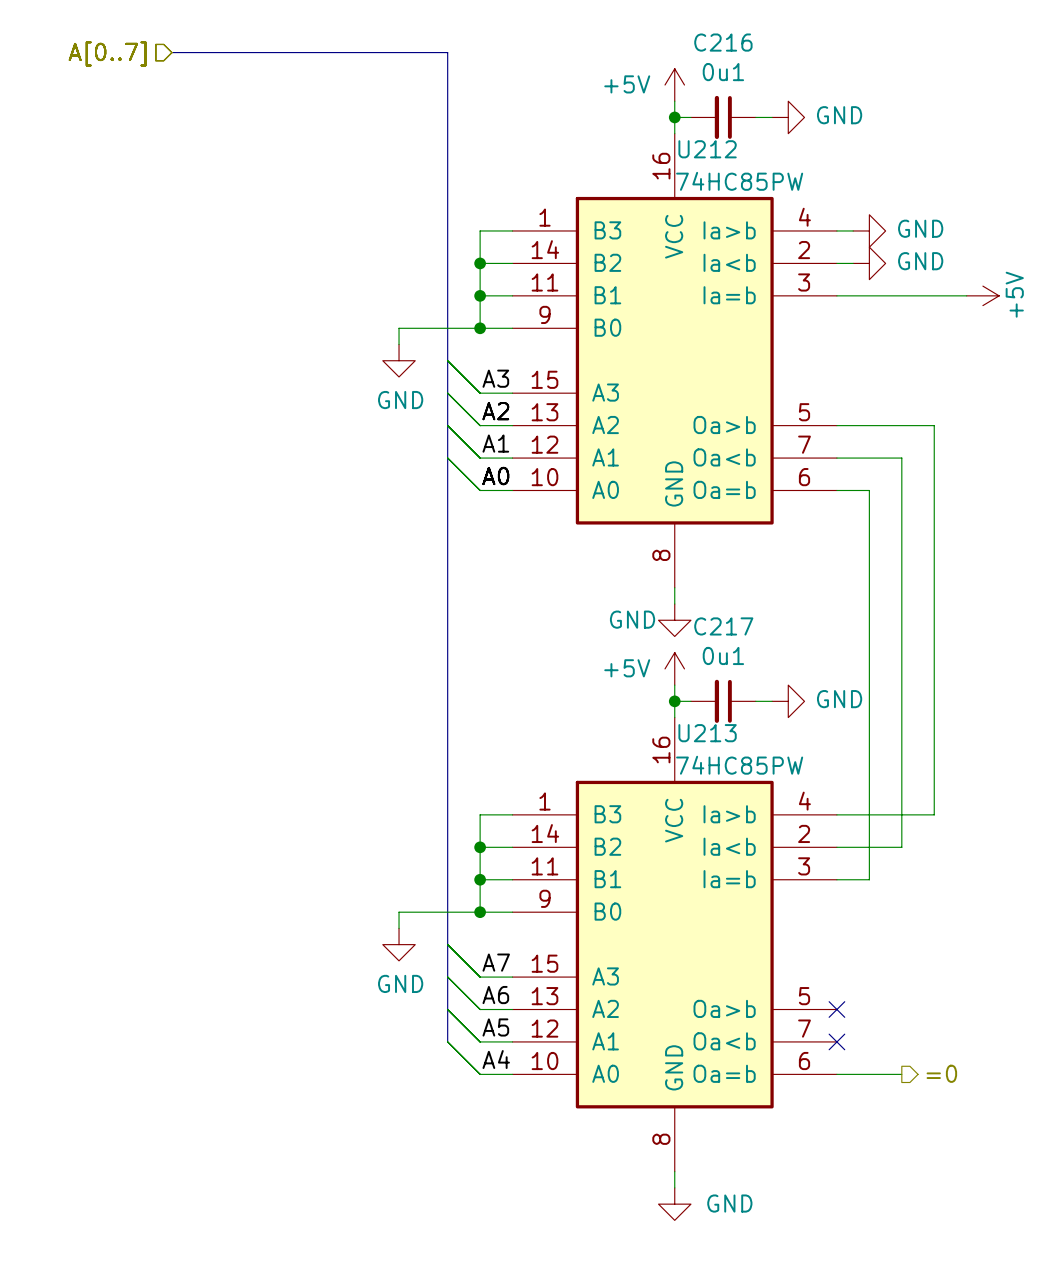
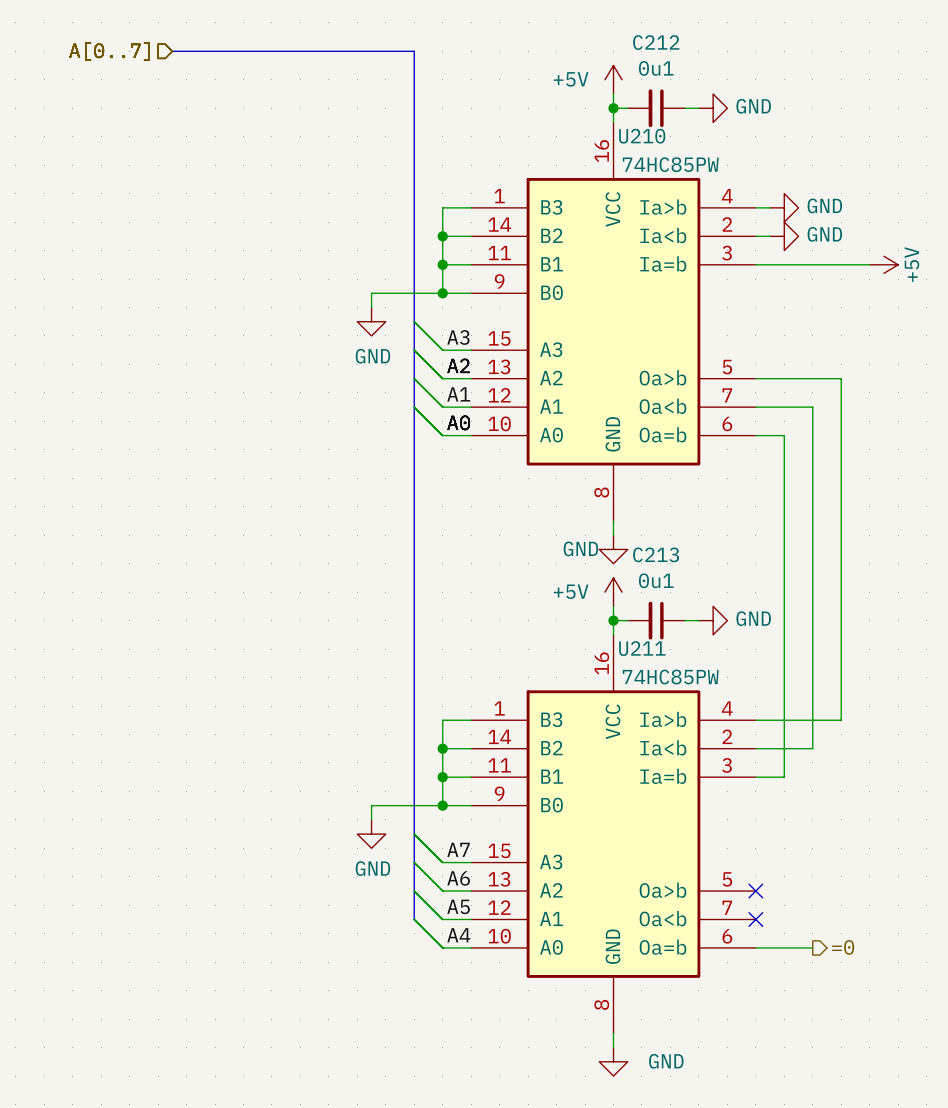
C216 name: C216 (723, 42) -> C212 (656, 42)
U212 name: U212 (707, 149) -> U210 (642, 136)
C217 name: C217 (723, 626) -> C213 (656, 554)
U213 name: U213 (707, 733) -> U211 (642, 648)

